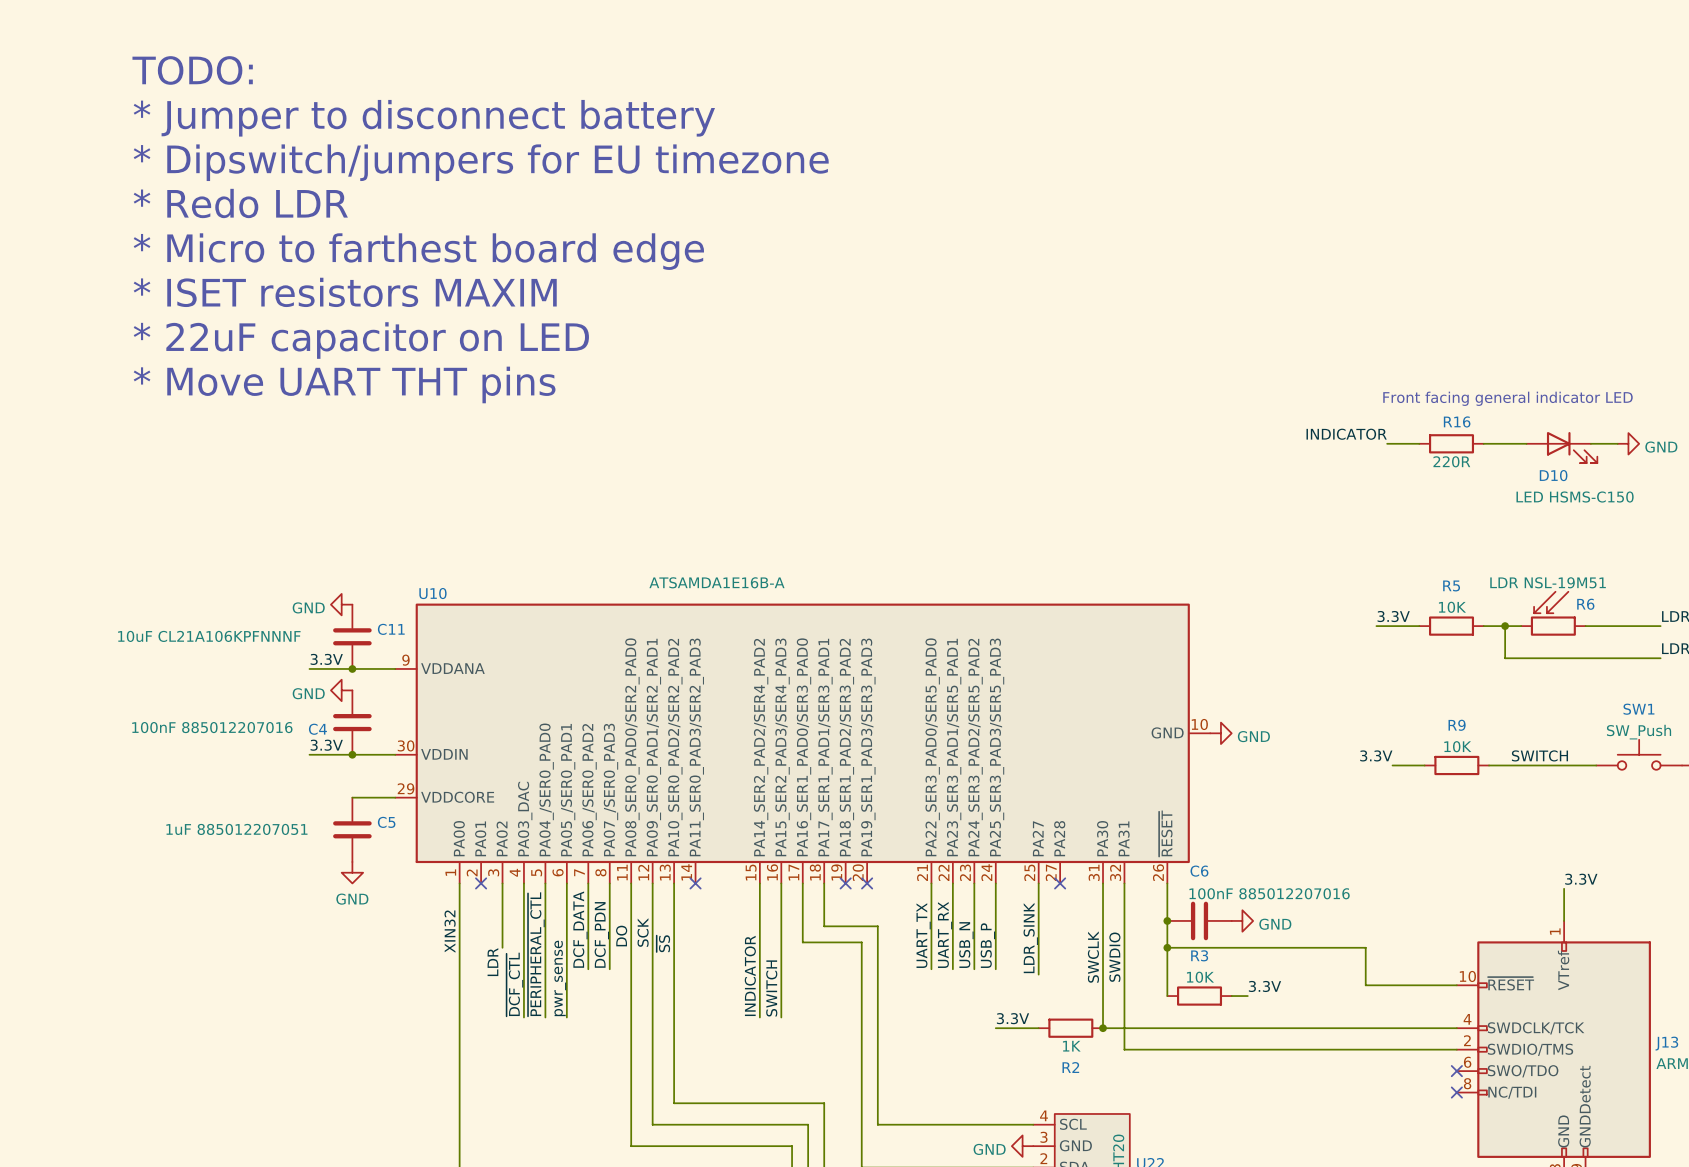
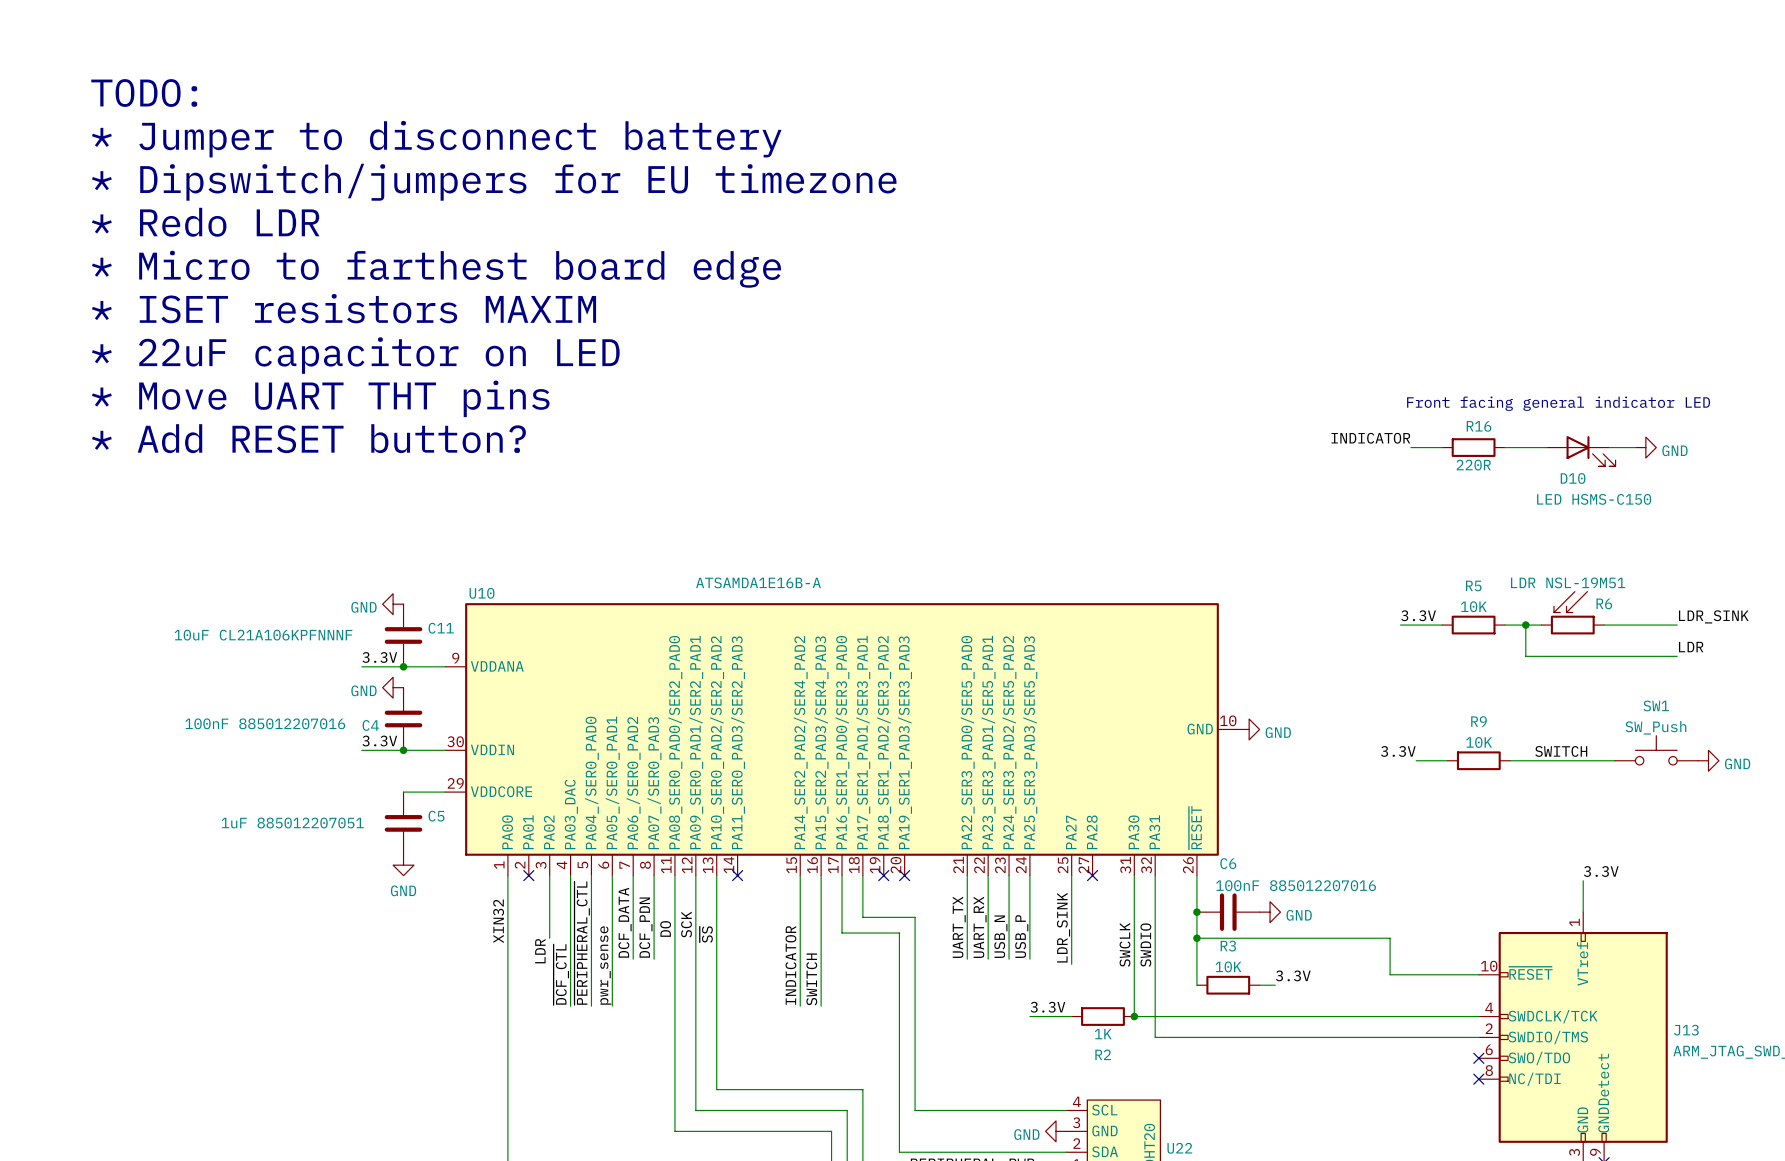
text position: TODO: (192, 70) -> TODO: (144, 93)
text position: * Jumper to disconnect battery (424, 118) -> * Jumper to disconnect battery (436, 139)
text position: * Dipswitch/jumpers for EU timezone (481, 162) -> * Dipswitch/jumpers for EU timezone (494, 182)
text position: * Redo LDR (240, 203) -> * Redo LDR (205, 222)
text position: * Micro to farthest board edge (418, 251) -> * Micro to farthest board edge (436, 269)
text position: * ISET resistors MAXIM (345, 292) -> * ISET resistors MAXIM (344, 308)
text position: * 22uF capacitor on LED (361, 340) -> * 22uF capacitor on LED (355, 355)
text position: * Move UART THT pins (344, 384) -> * Move UART THT pins (320, 398)
text: none -> * Add RESET button? (308, 438)

